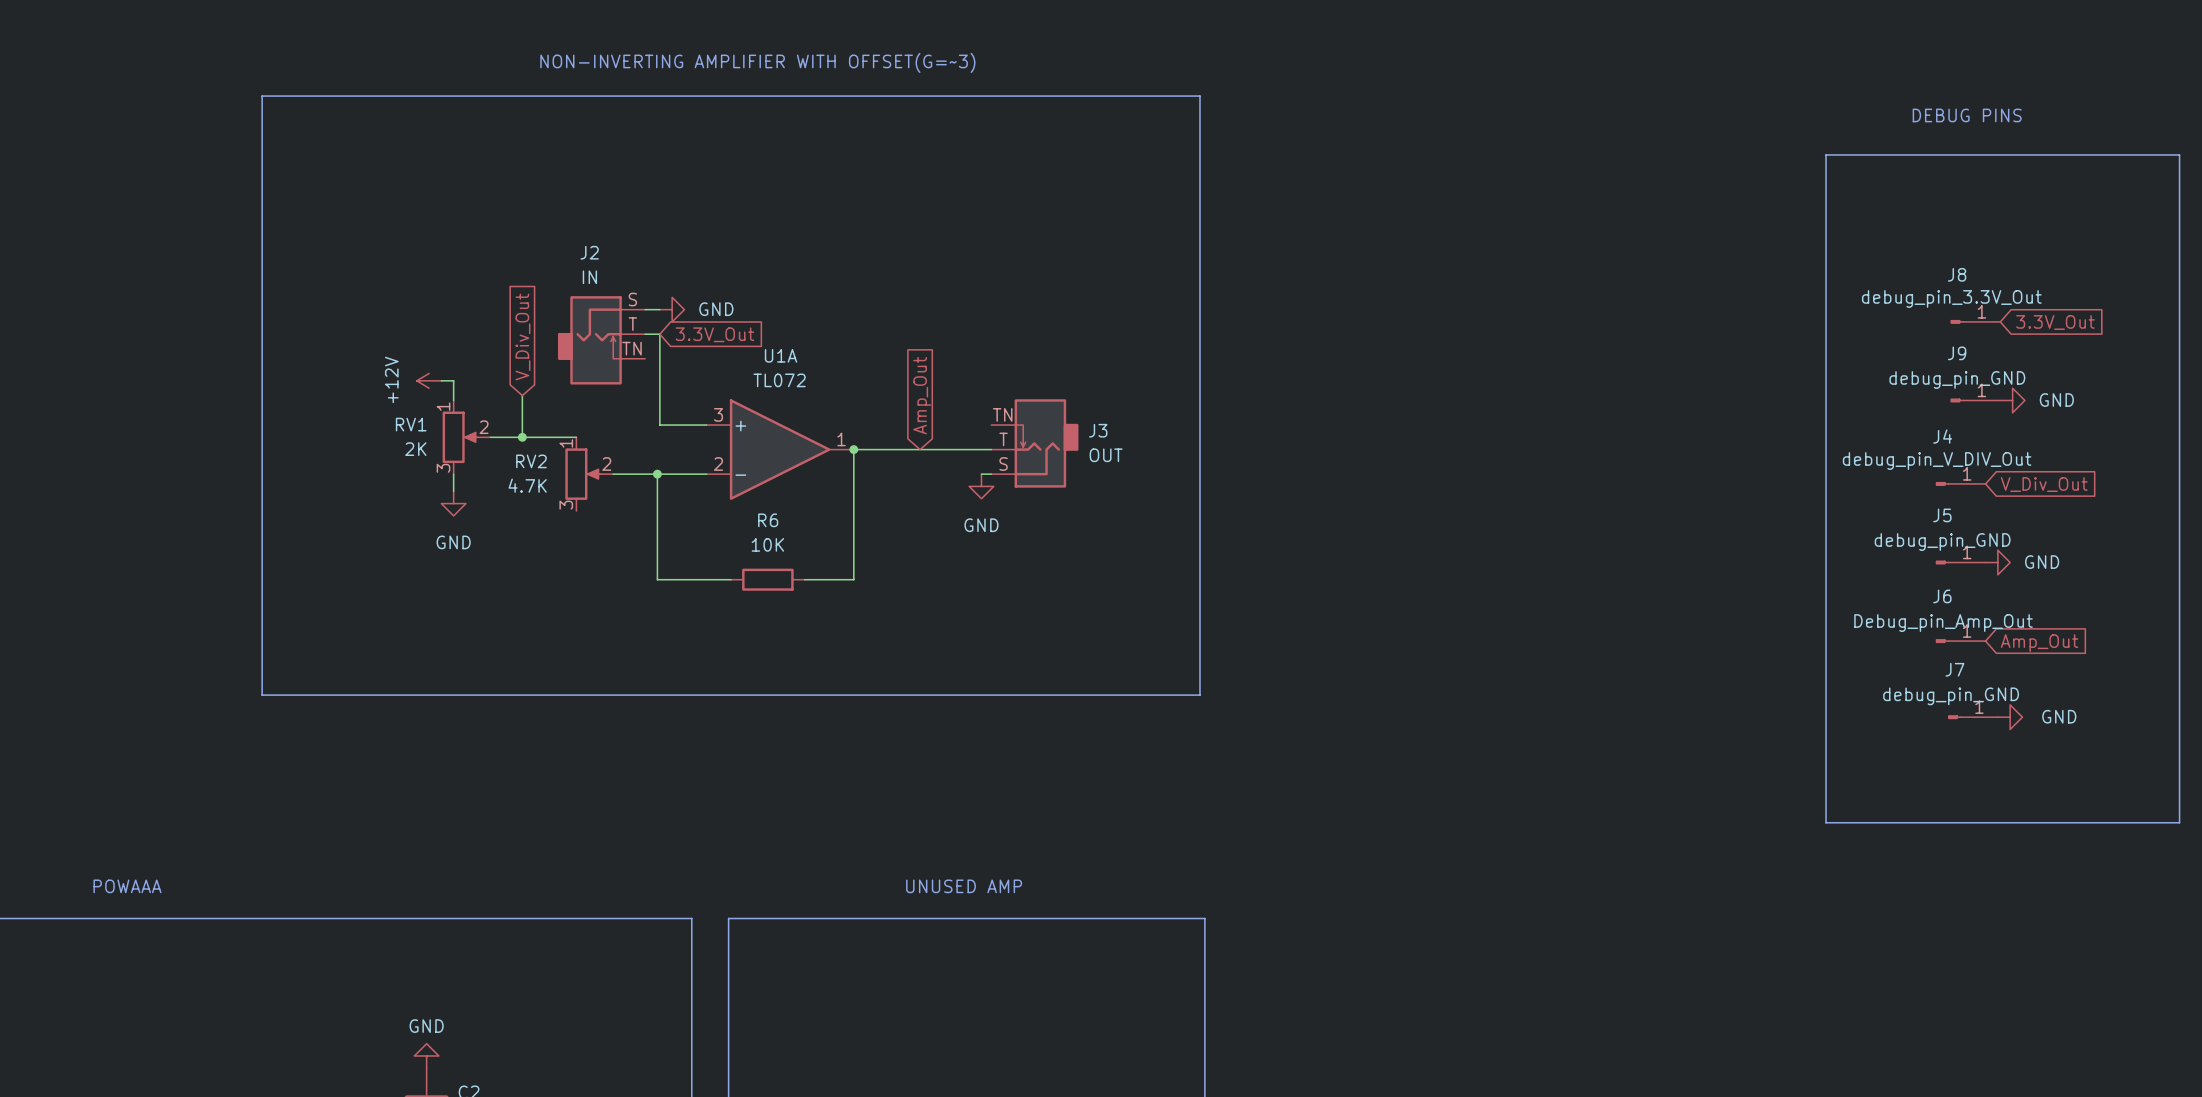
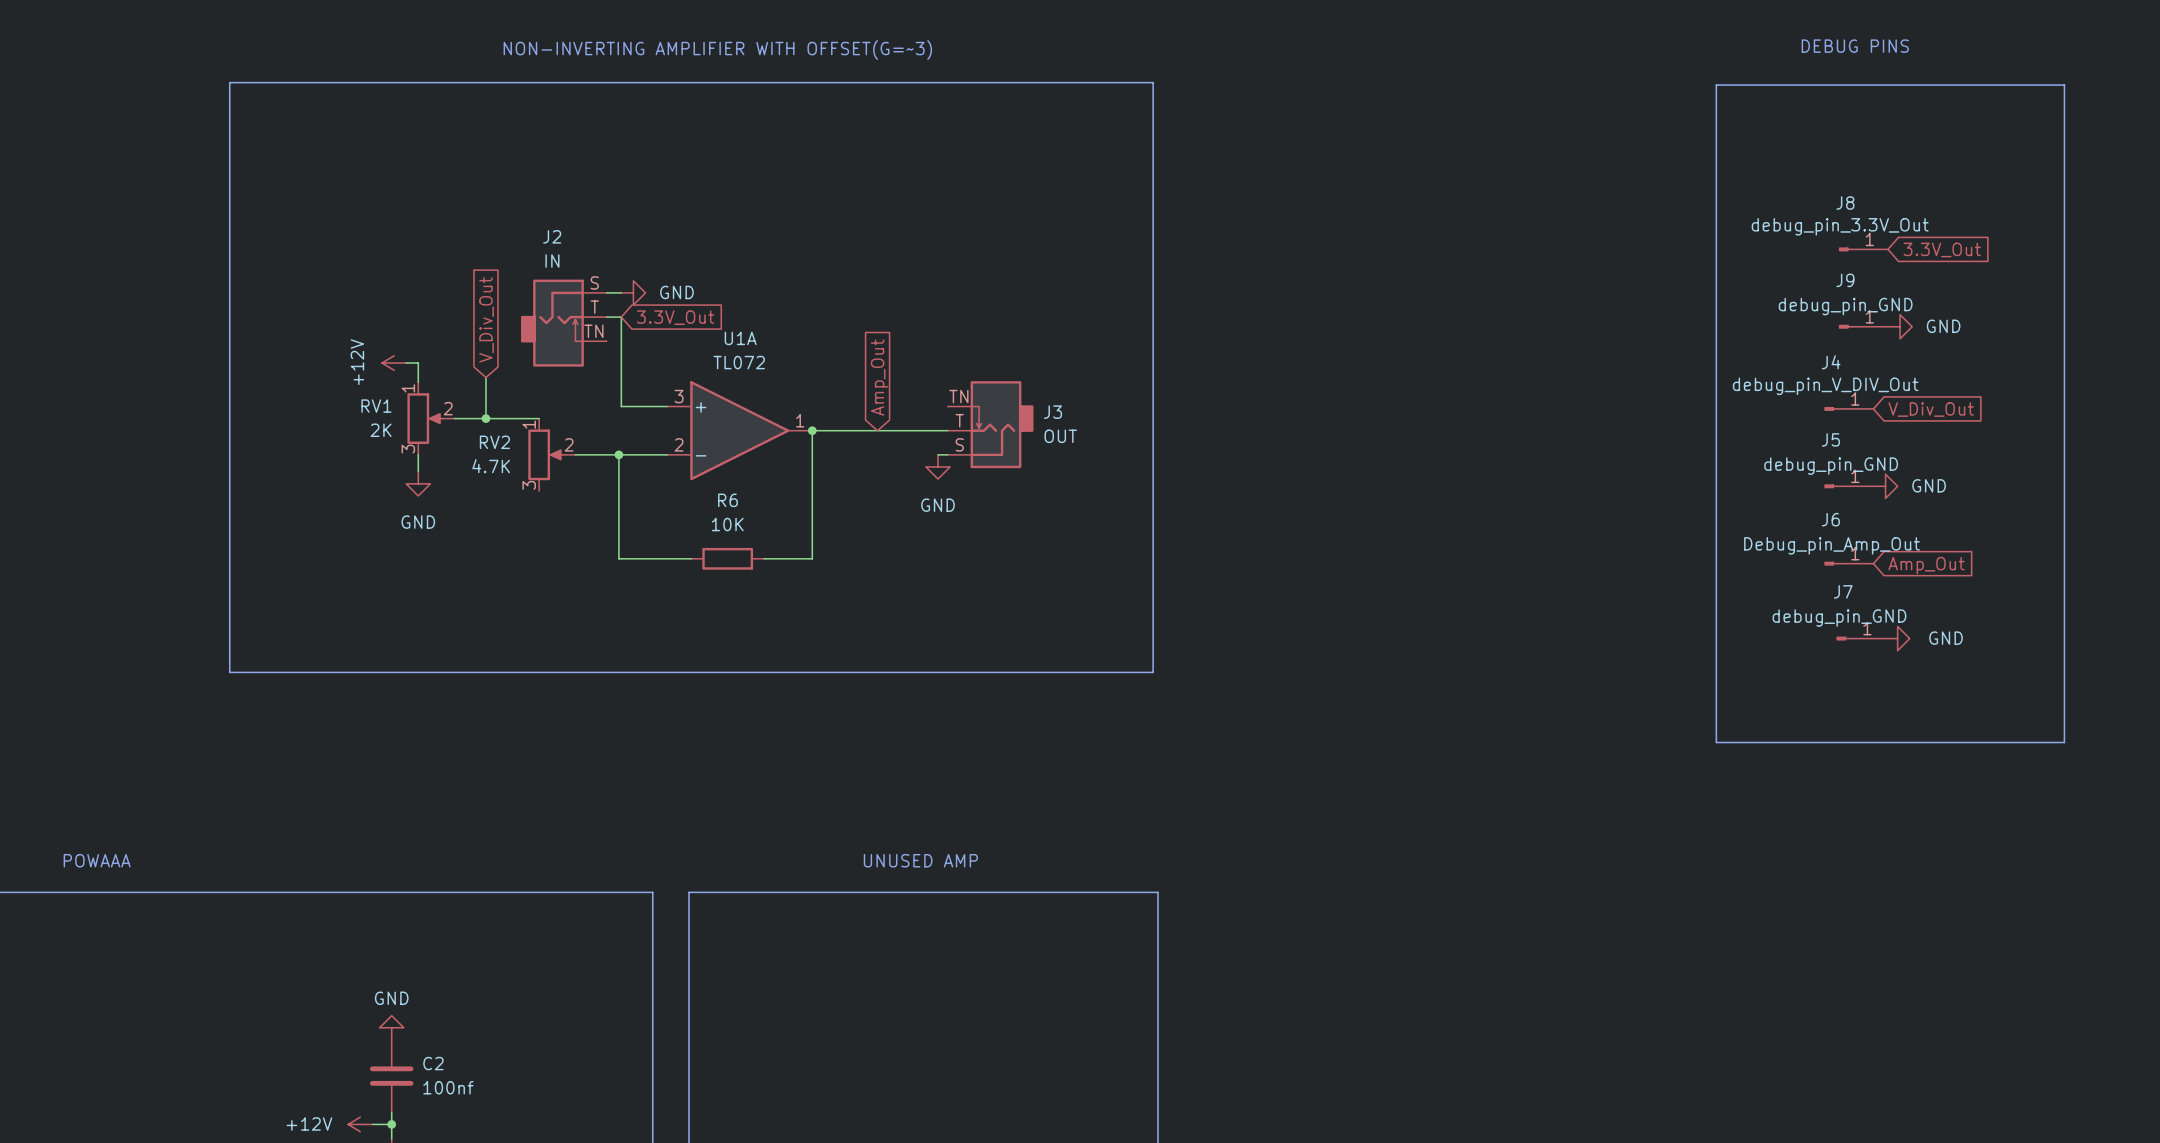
text position: DEBUG PINS (1967, 115) -> DEBUG PINS (1855, 46)
line: (1826, 154) (2179, 154) (2179, 822) (1826, 822) (1826, 154) -> (1716, 85) (2064, 85) (2064, 742) (1716, 742) (1716, 85)
J8 position: (1975, 321) -> (1863, 249)
global label position: 3.3V_Out (2055, 322) -> 3.3V_Out (1942, 249)
power symbol: none -> GND (1900, 326)
J9 position: (1975, 400) -> (1863, 326)
power symbol: GND (2012, 400) -> none
J4 position: (1960, 483) -> (1848, 408)
global label position: V_Div_Out (2044, 484) -> V_Div_Out (1931, 409)
power symbol: none -> GND (1885, 486)
J5 position: (1960, 562) -> (1848, 486)
power symbol: GND (1997, 562) -> none
J6 position: (1960, 641) -> (1848, 563)
global label position: Amp_Out (2039, 643) -> Amp_Out (1926, 565)
power symbol: none -> GND (1897, 638)
J7 position: (1972, 717) -> (1861, 638)
power symbol: GND (2010, 717) -> none

